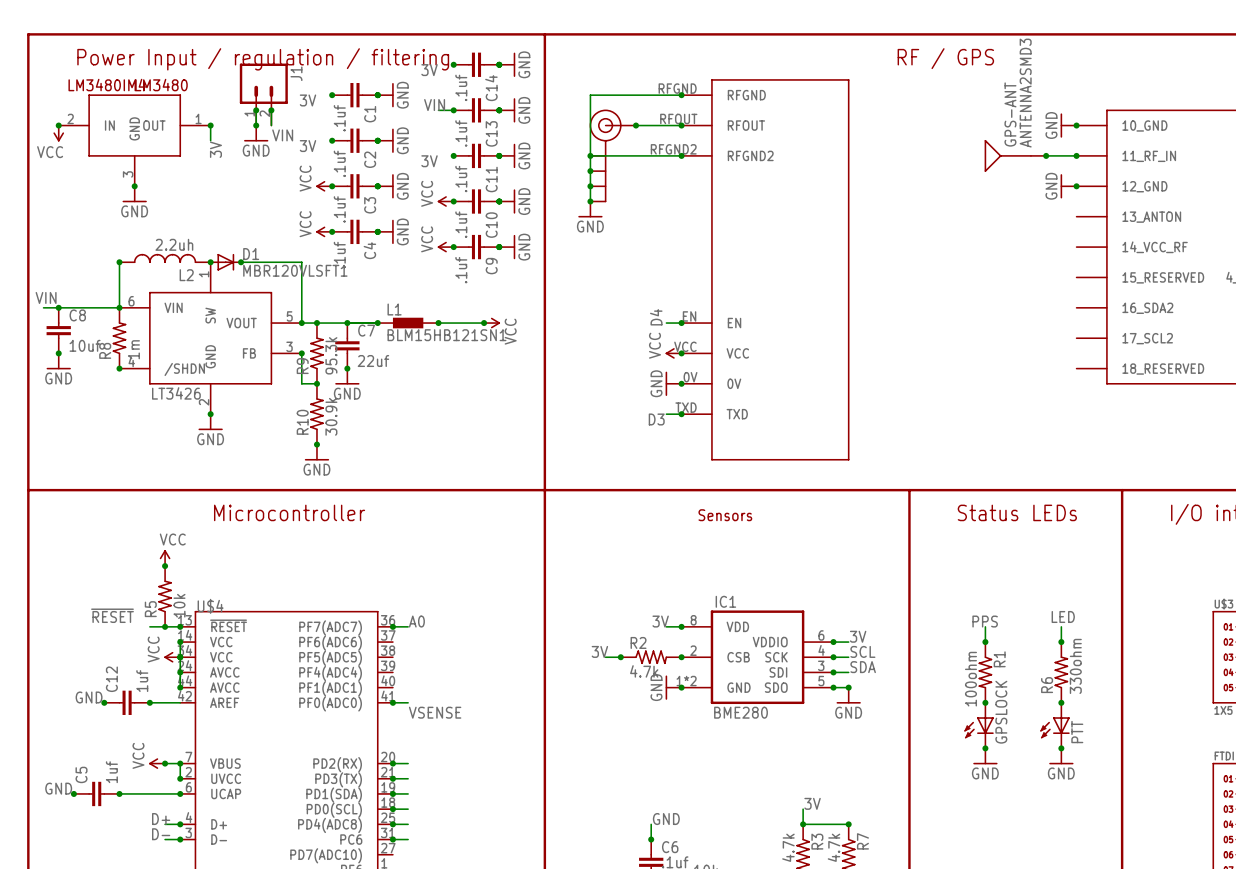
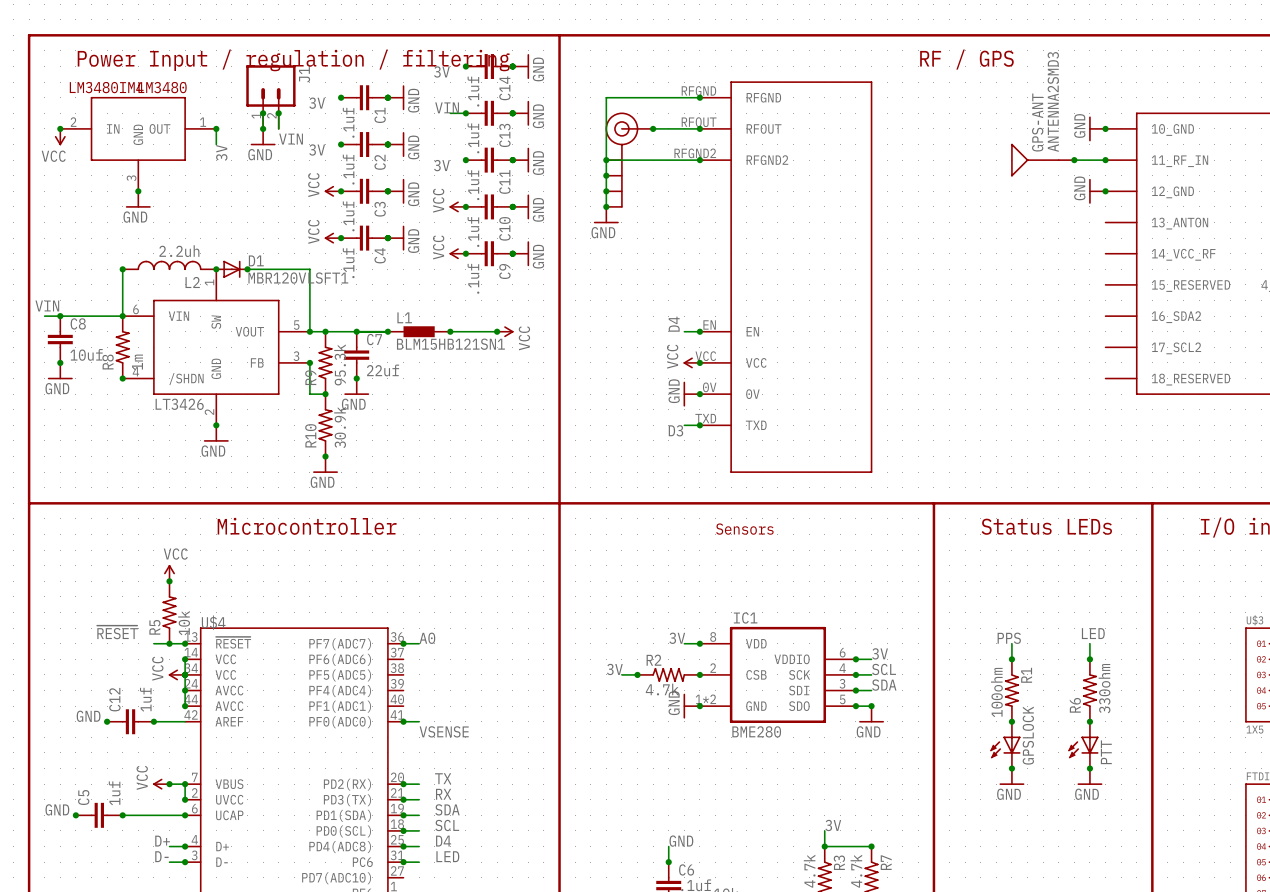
label: none -> TX (443, 778)
label: none -> RX (443, 794)
label: none -> SDA (447, 809)
label: none -> SCL (447, 825)
label: none -> D4 (443, 841)
label: none -> LED (447, 856)

